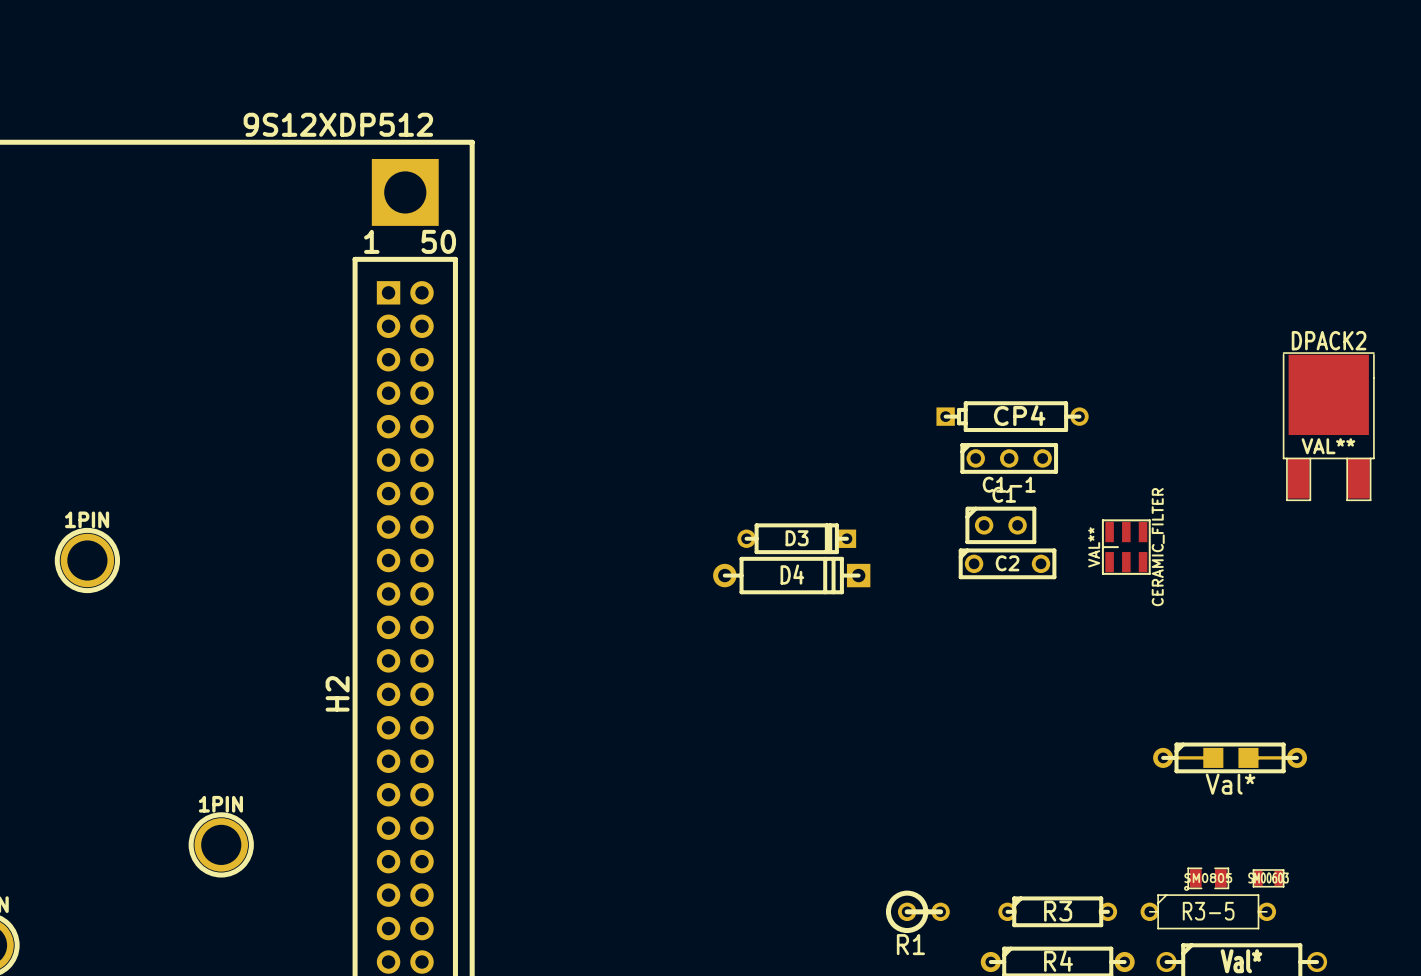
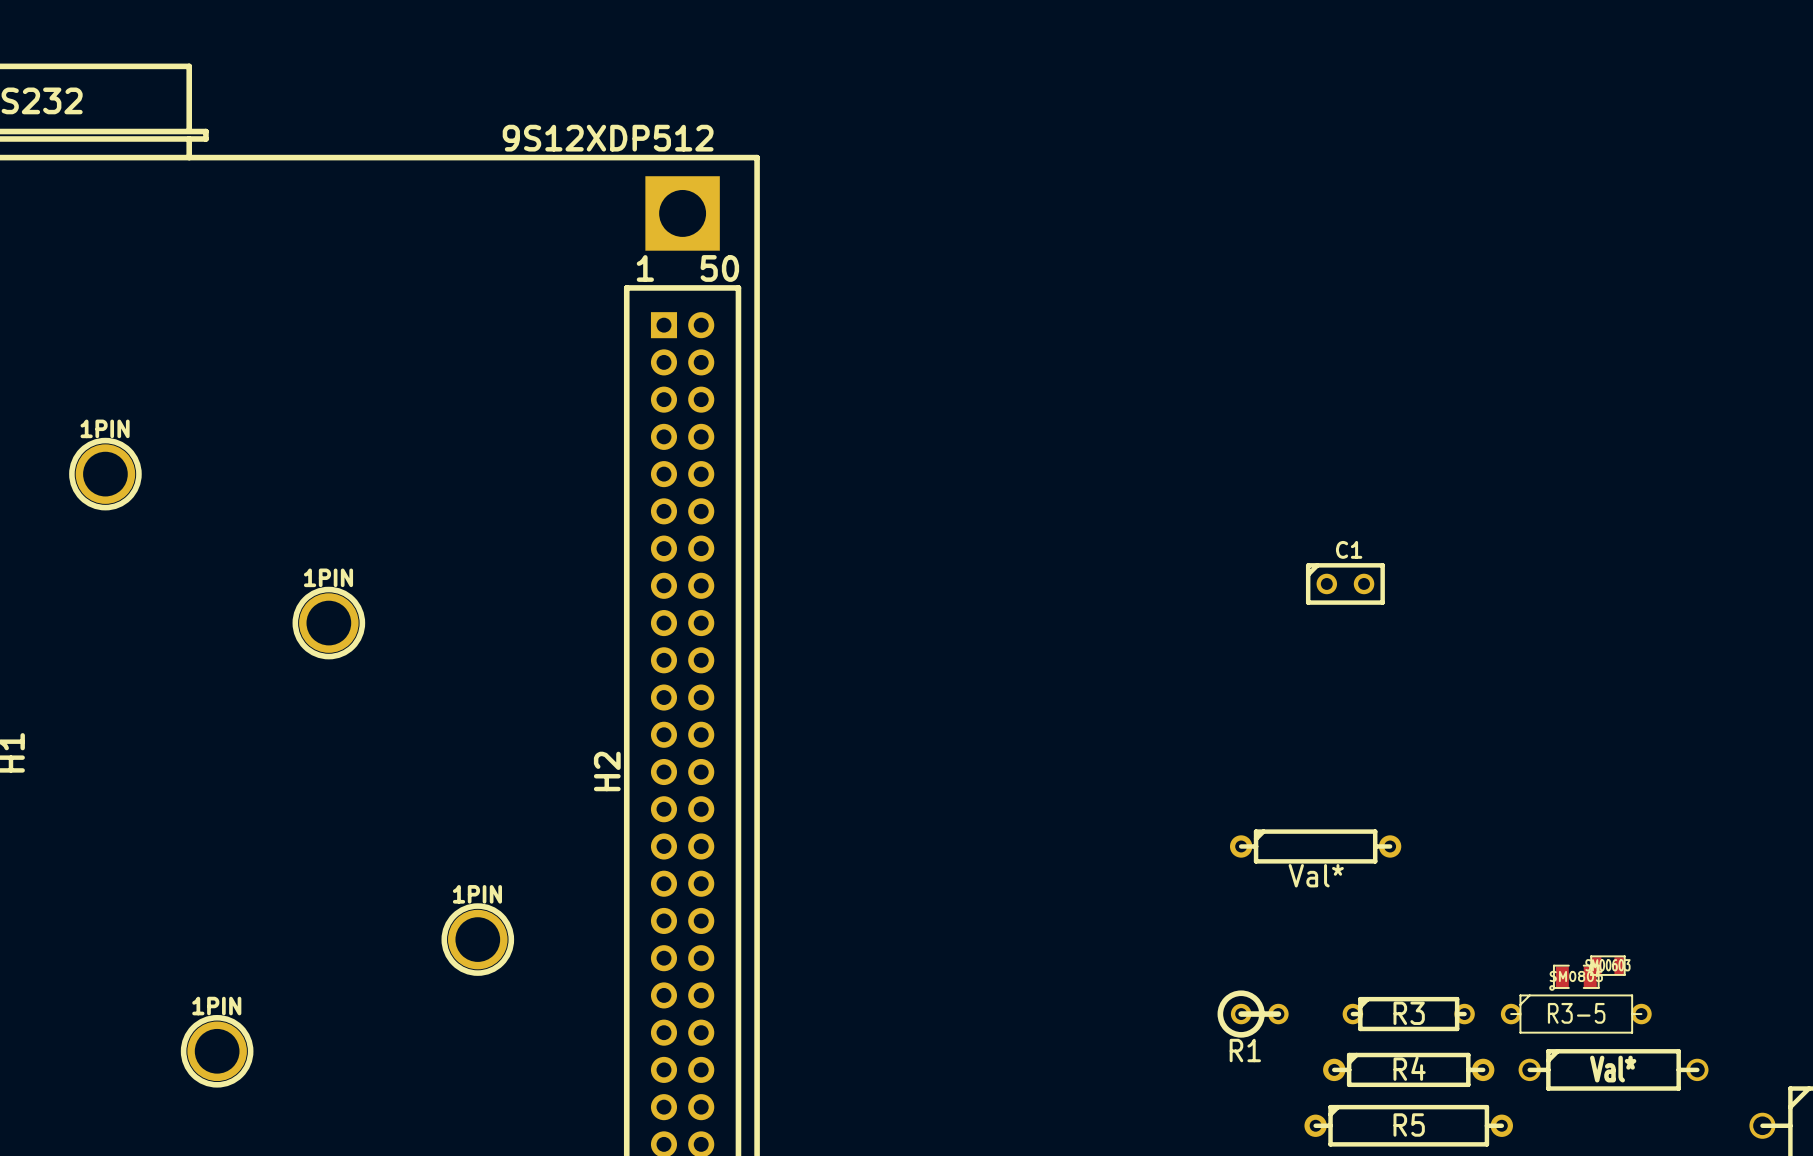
CP4: (1012, 416) -> none
DPACK2: VAL** (1328, 426) -> none
C1-1: (1009, 458) -> none
D3: (796, 538) -> none
CERAMIC_FILTER: VAL** (1126, 547) -> none
C2: (1007, 563) -> none
D4: (791, 575) -> none
part: Val* (1230, 757) -> none
part: none -> Val* (1315, 846)
SM00603 position: (1268, 878) -> (1607, 965)

